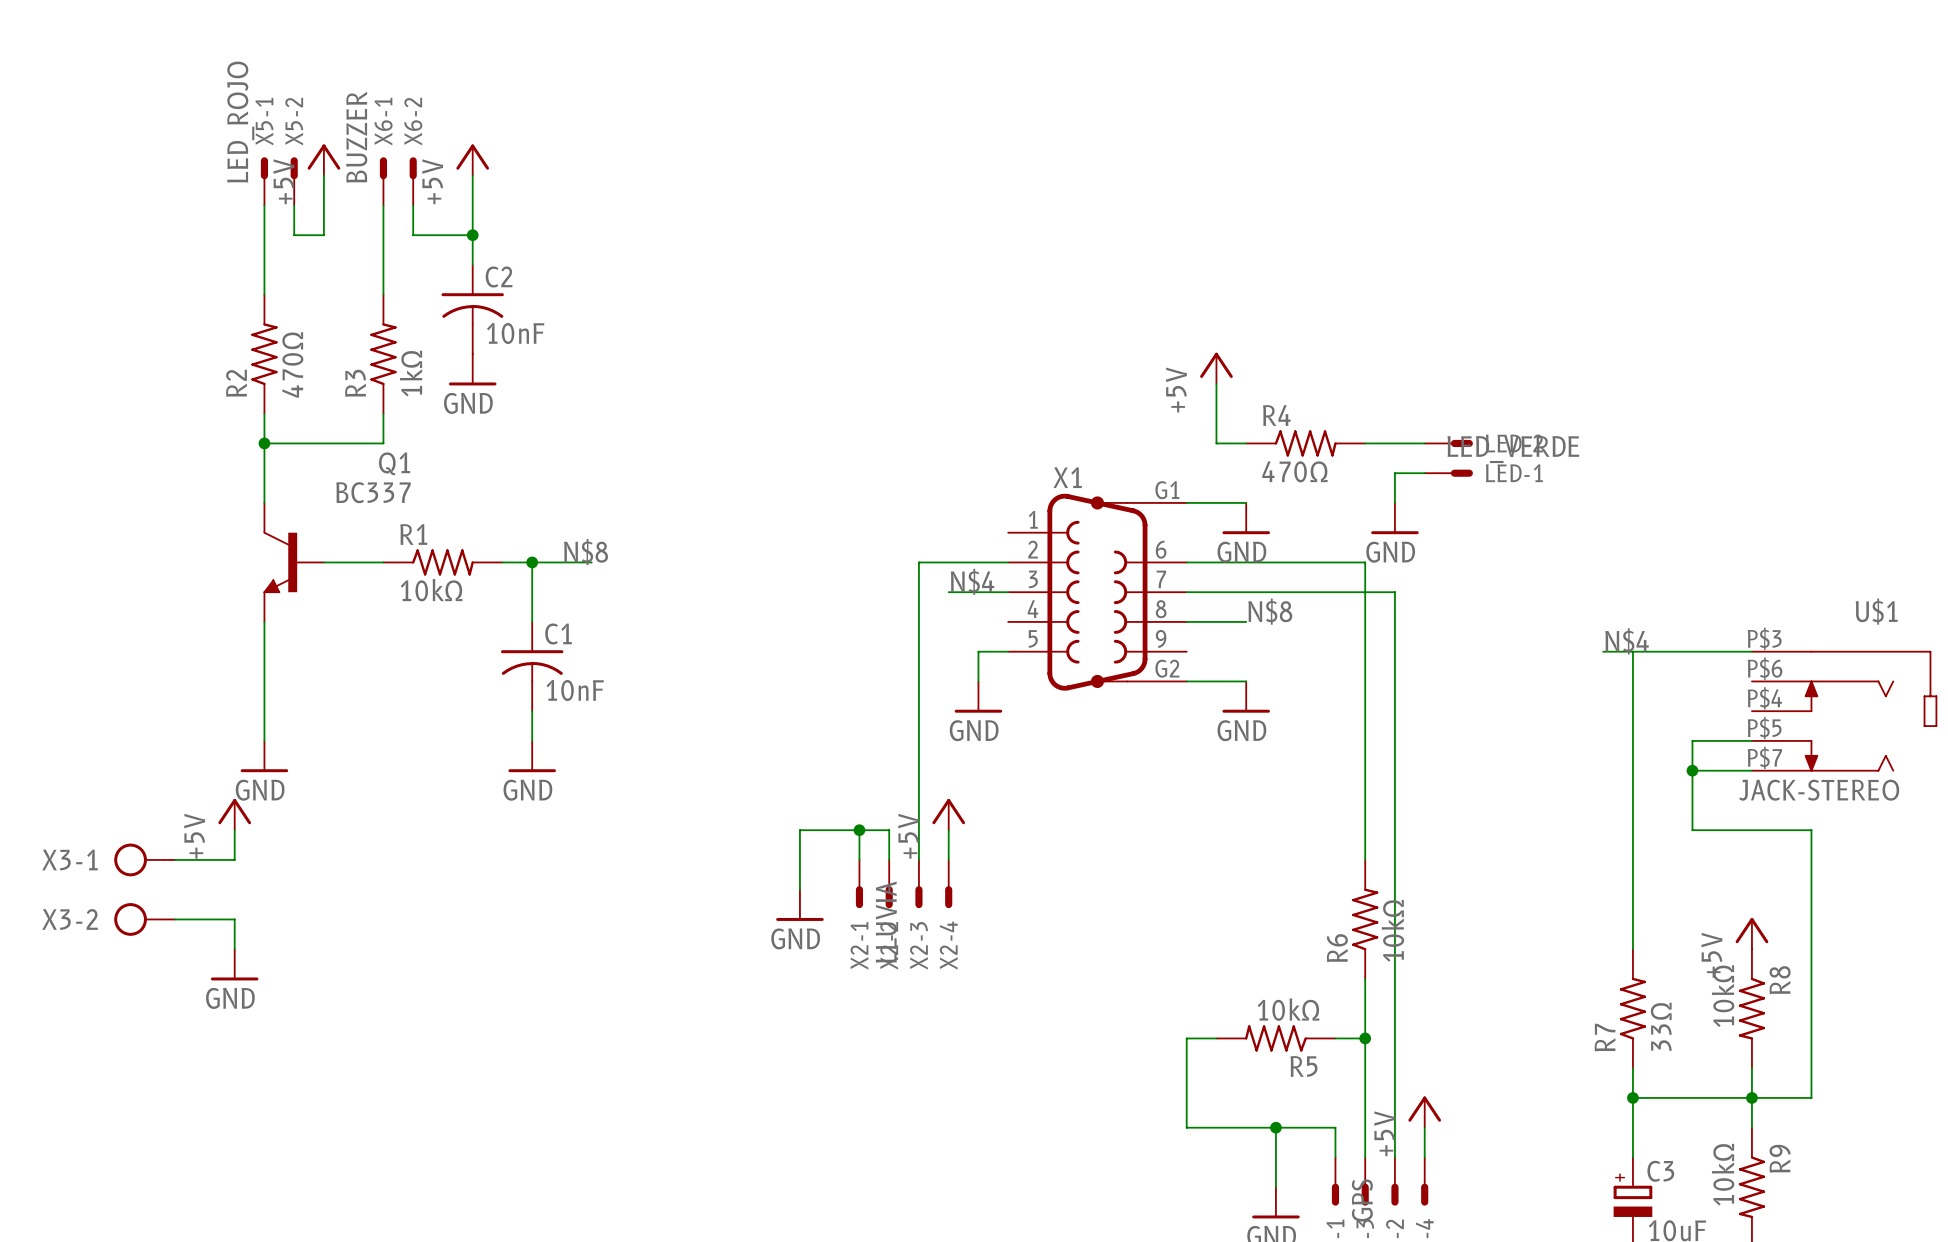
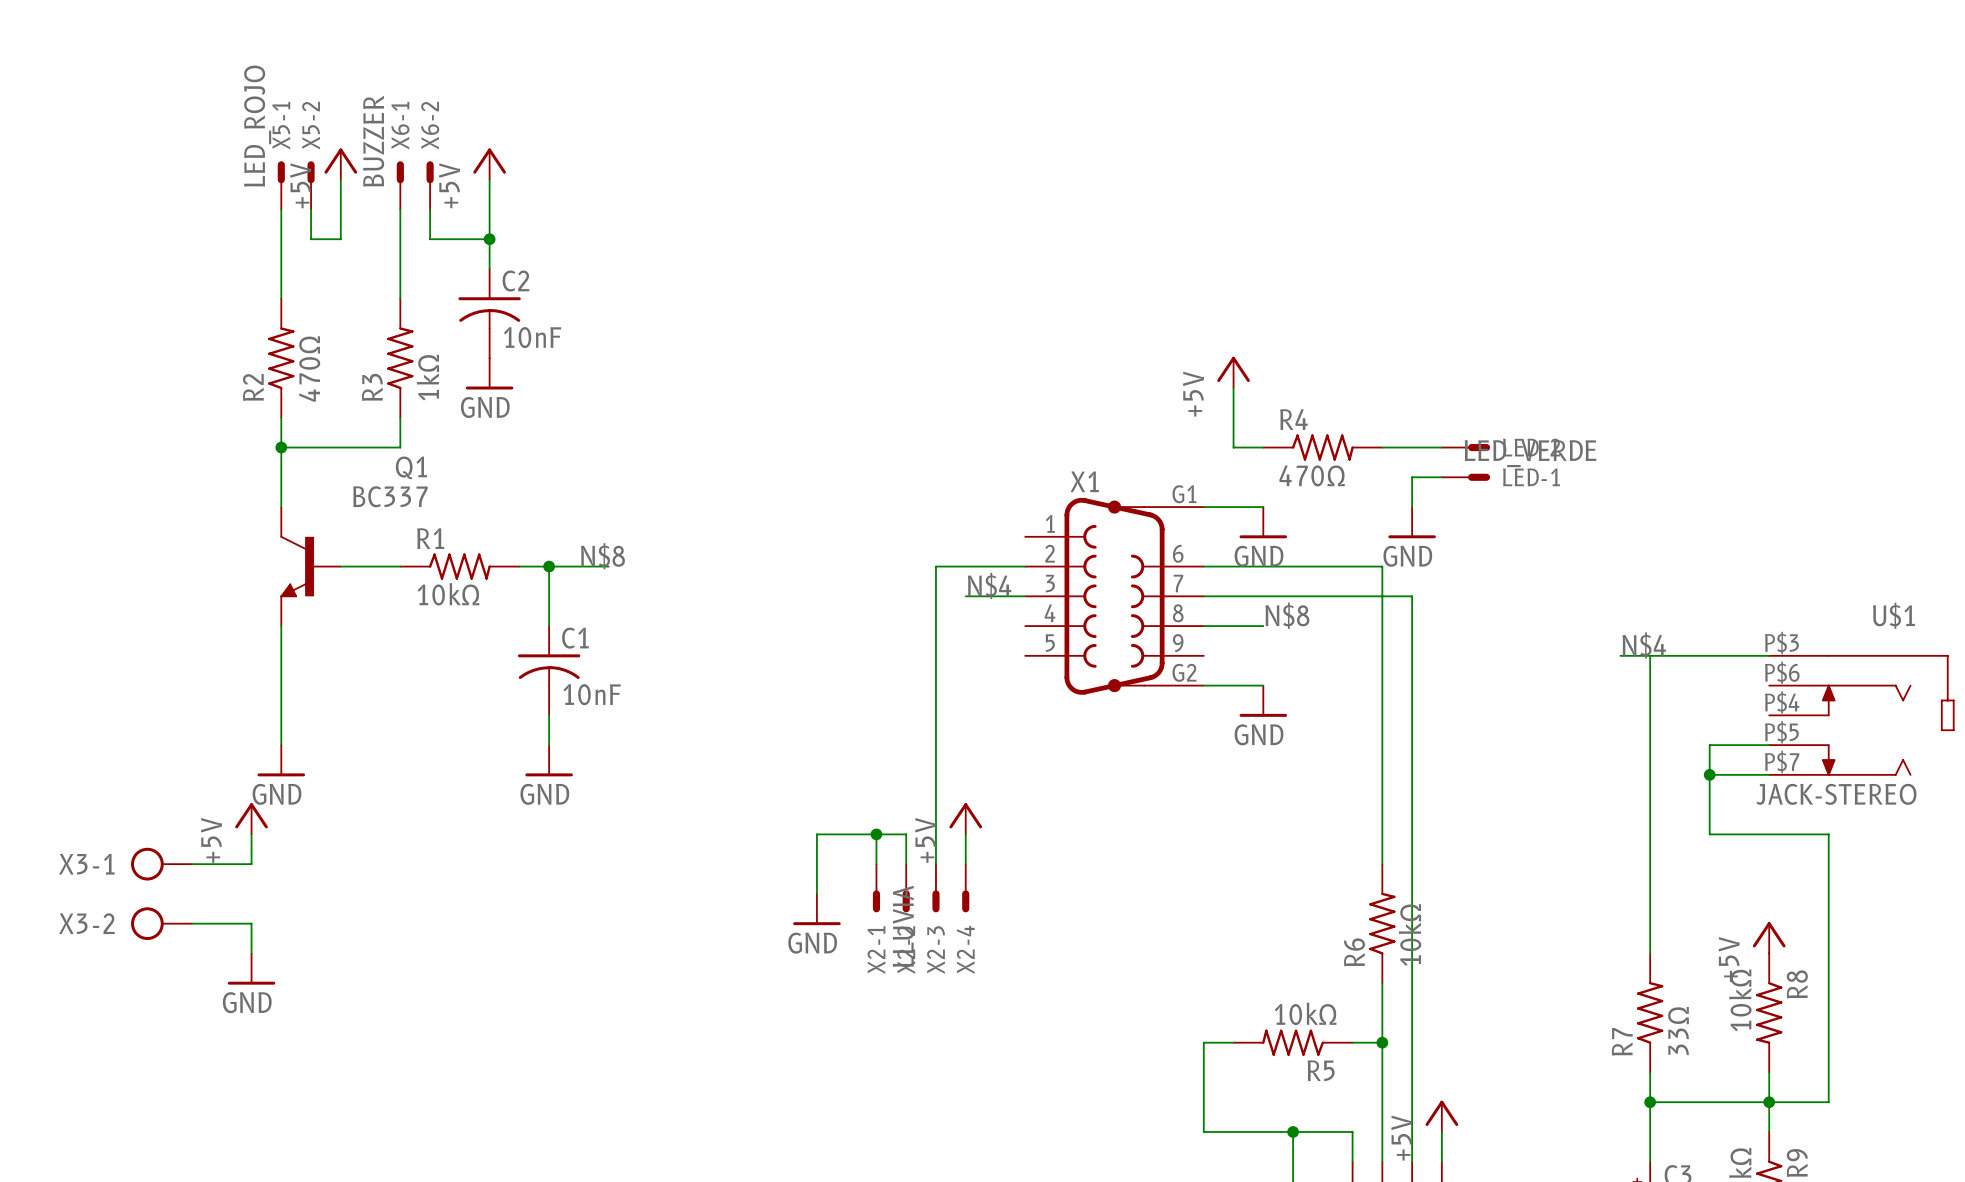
wire: (1008, 651) (978, 651) (978, 681) -> none
power symbol: GND (978, 697) -> none

